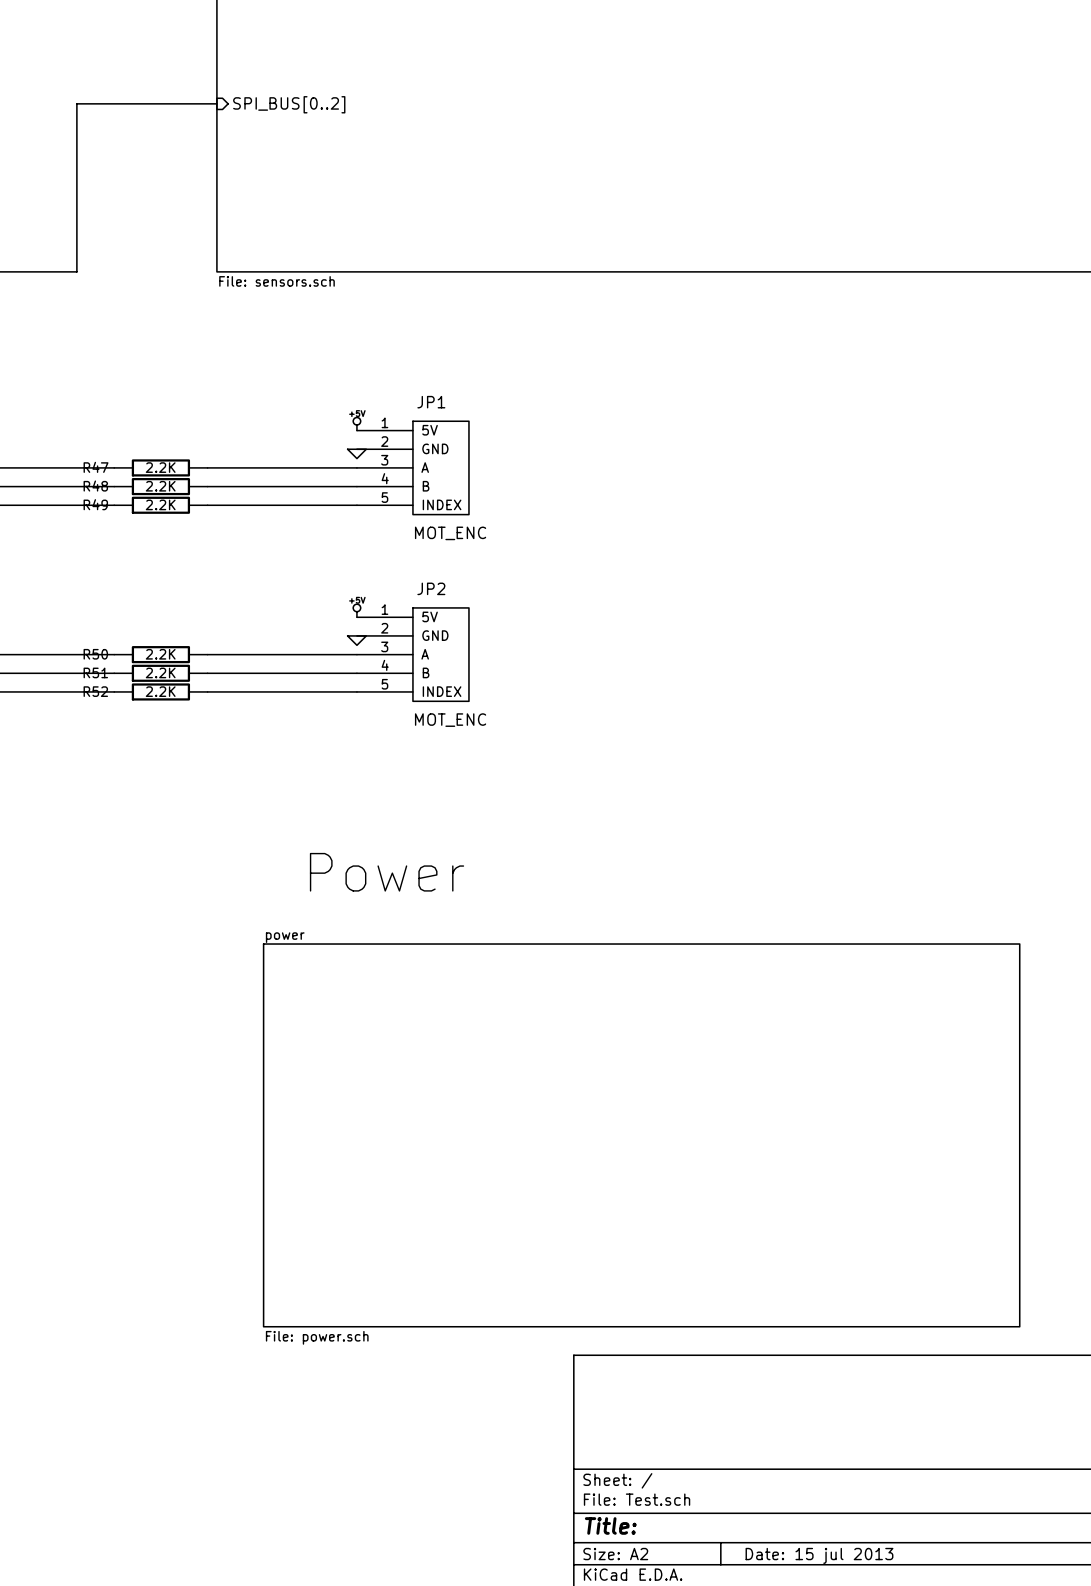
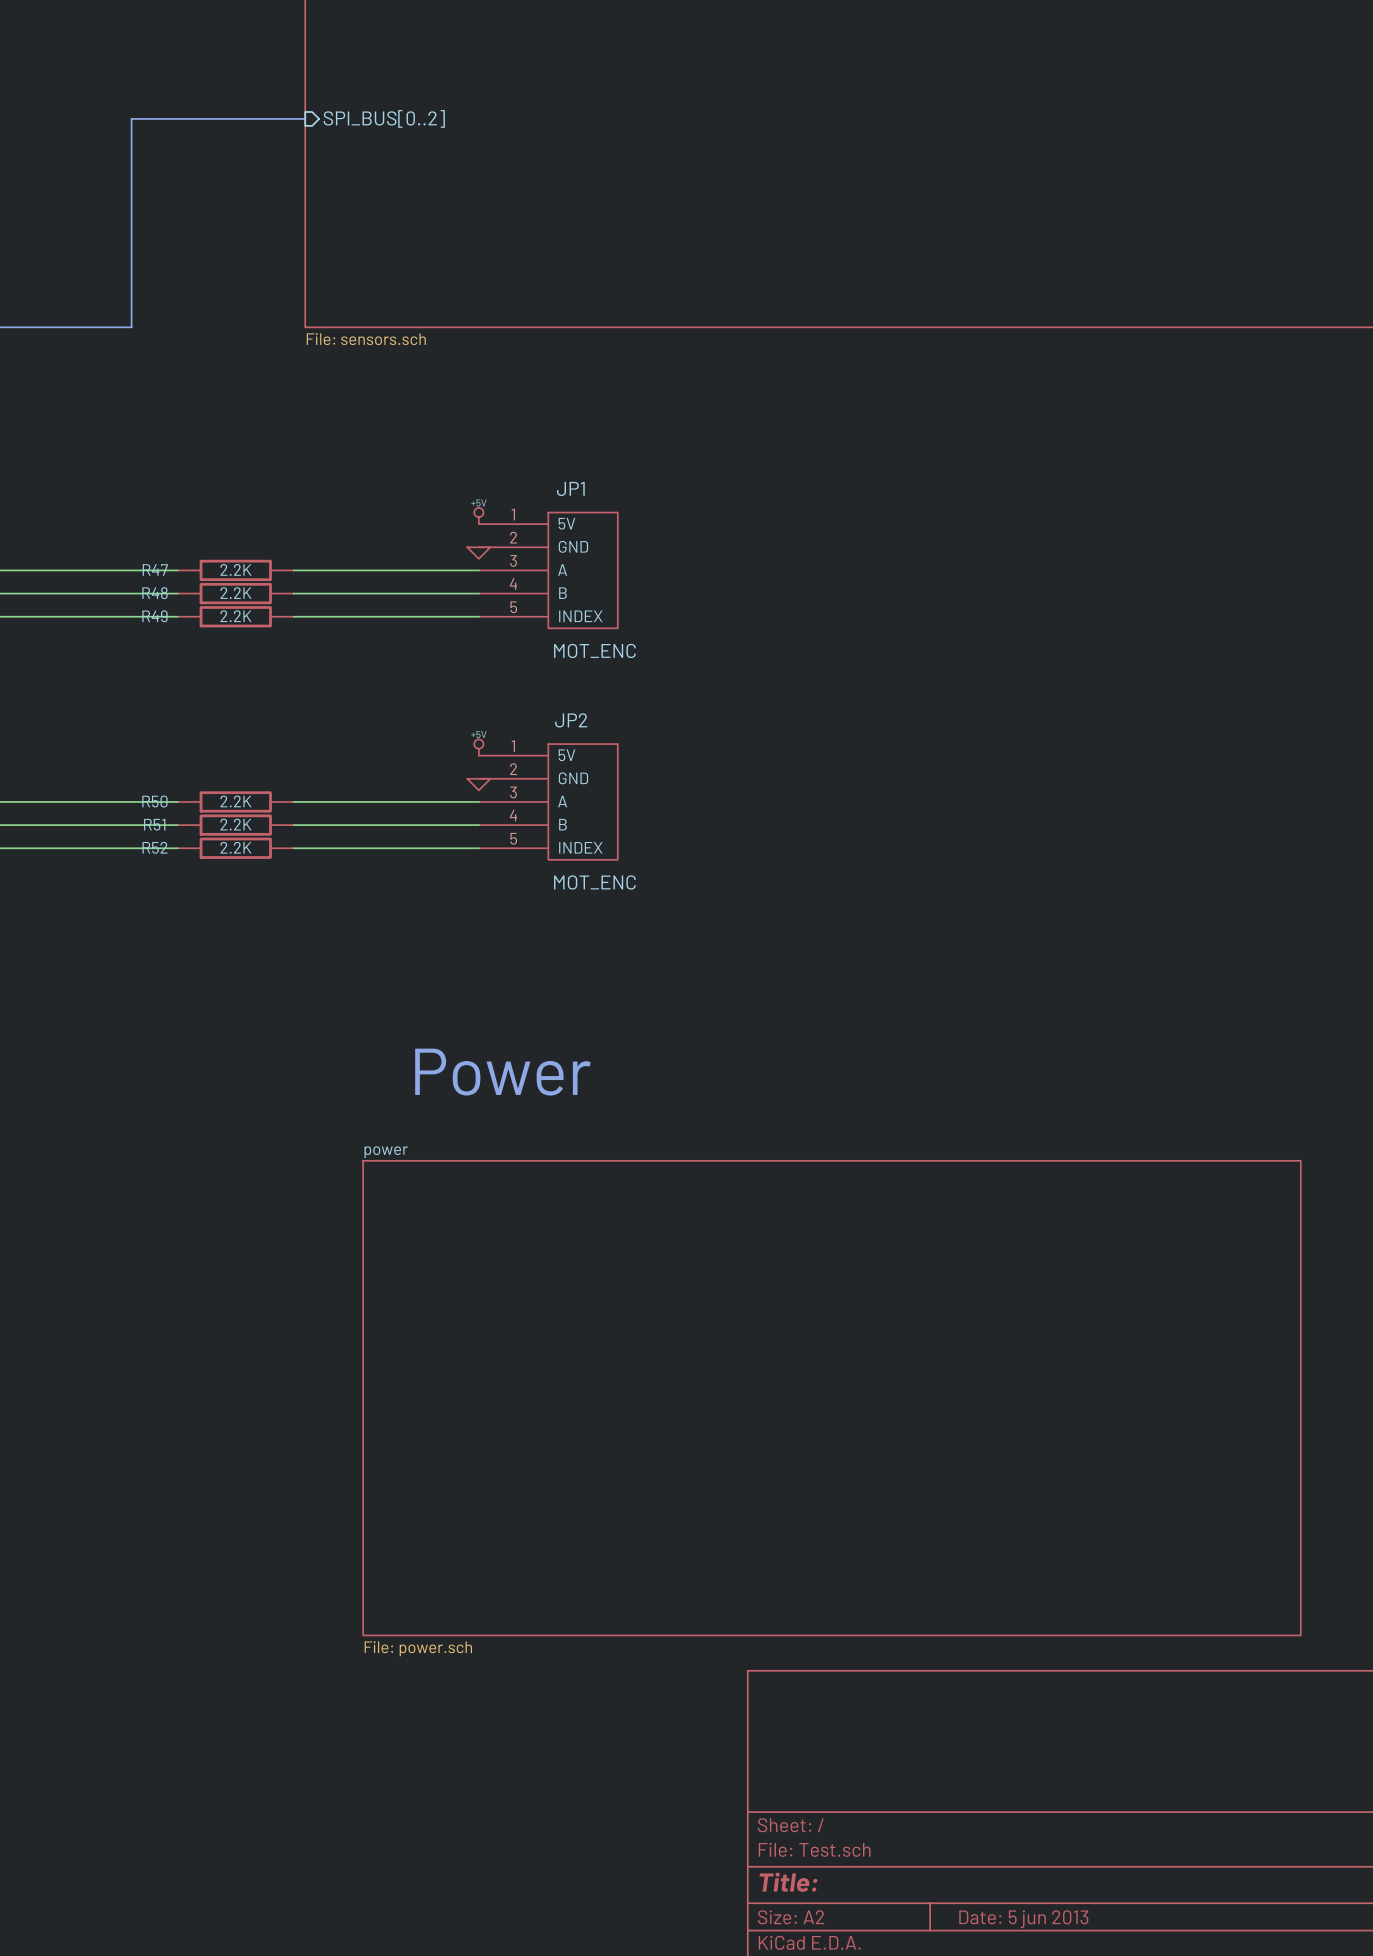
title block: Date: 15 jul 2013 (819, 1555) -> Date: 5 jun 2013 (1023, 1919)

